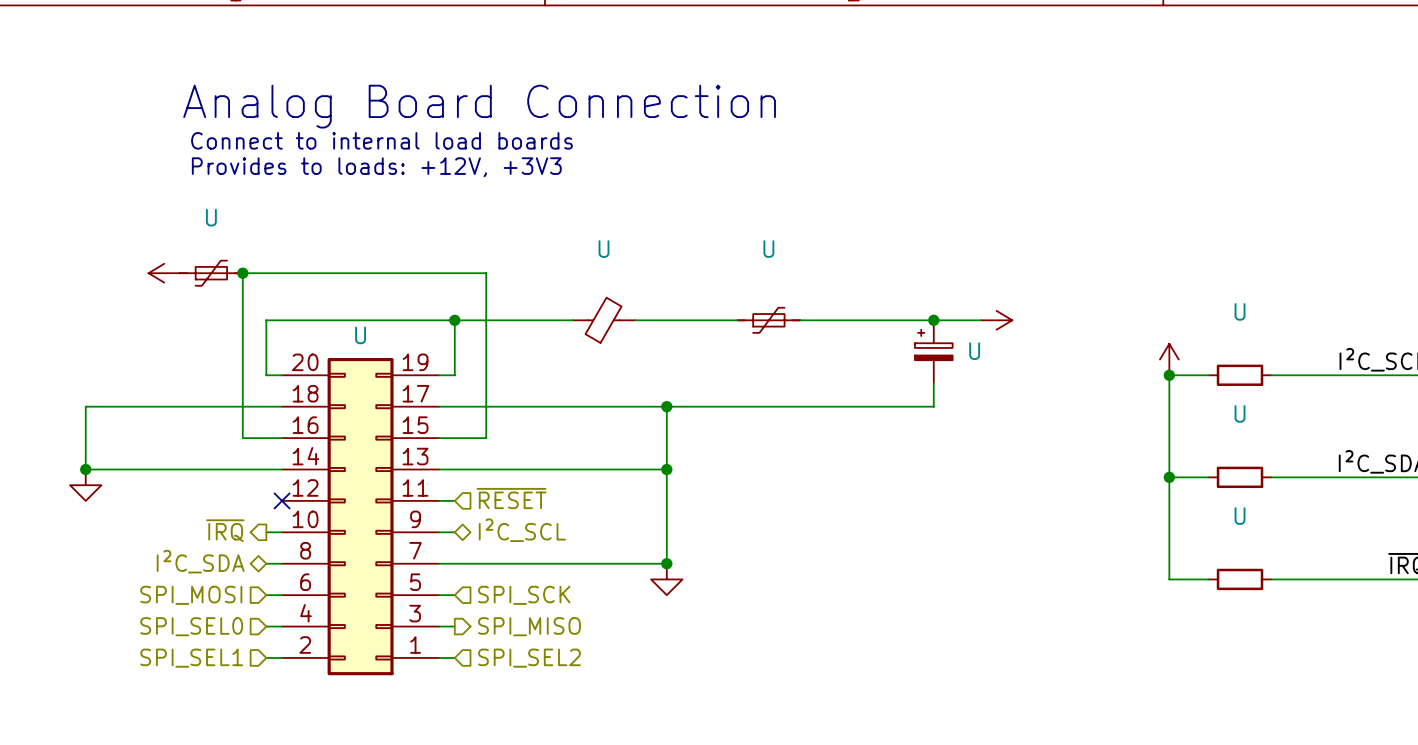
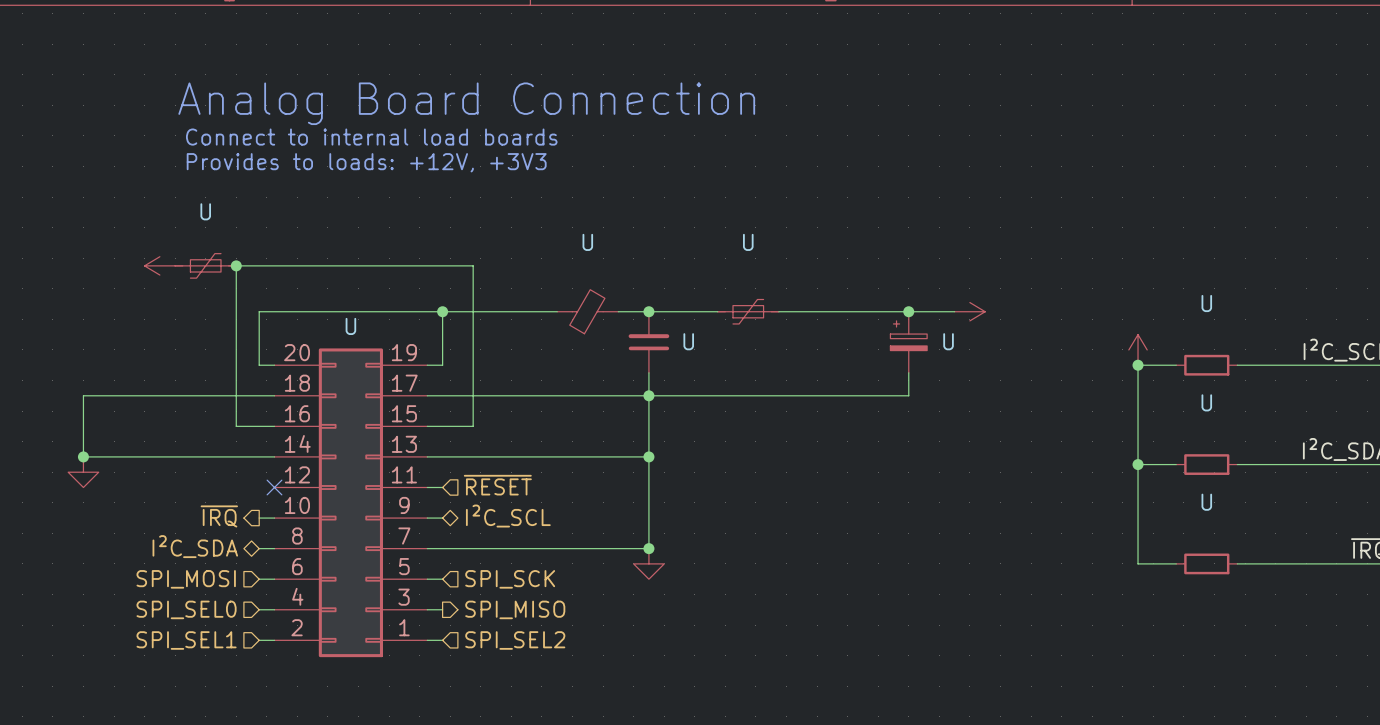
junction: none -> (648, 311)
U: none -> (648, 342)
wire: none -> (648, 372) (648, 395)

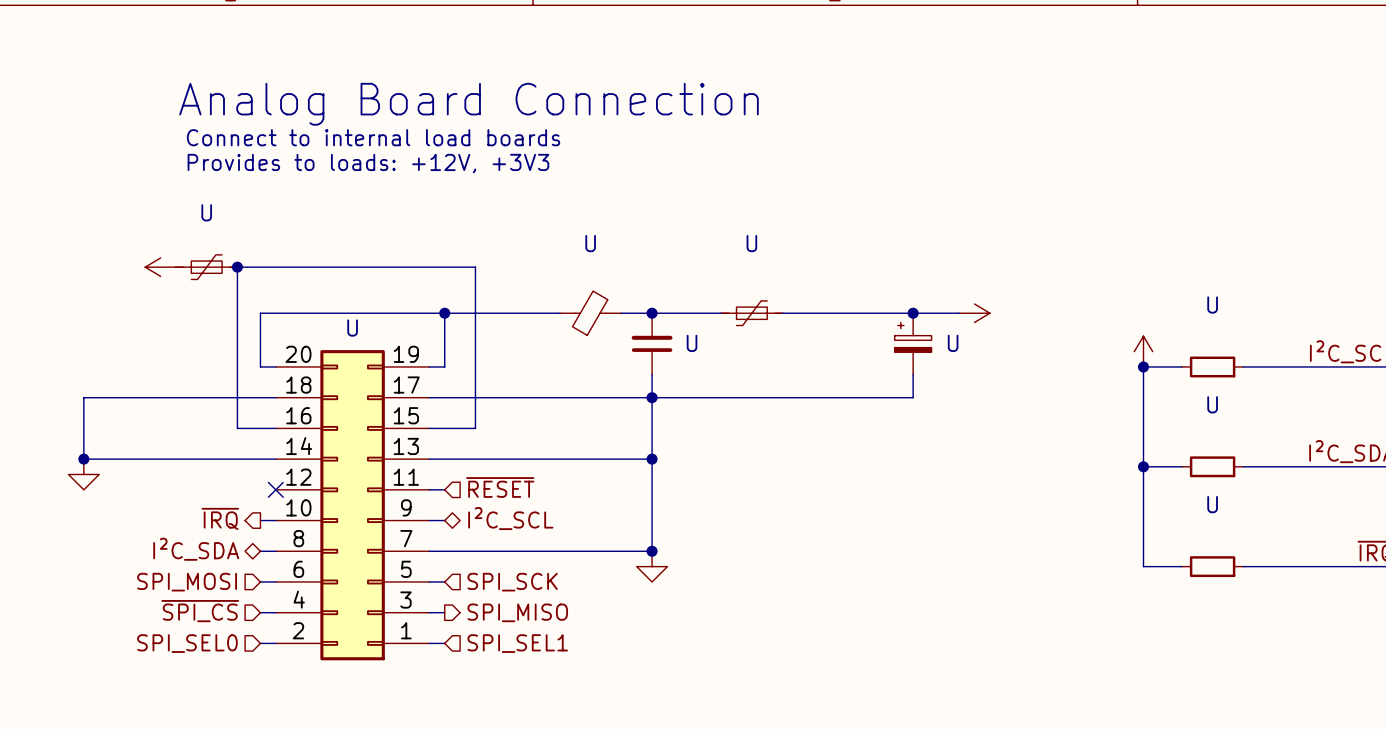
hierarchical label: SPI_SEL0 (186, 609) -> ~{SPI_CS} (200, 611)
hierarchical label: SPI_SEL1 (186, 640) -> SPI_SEL0 (187, 643)
hierarchical label: SPI_SEL2 (515, 640) -> SPI_SEL1 (517, 643)

